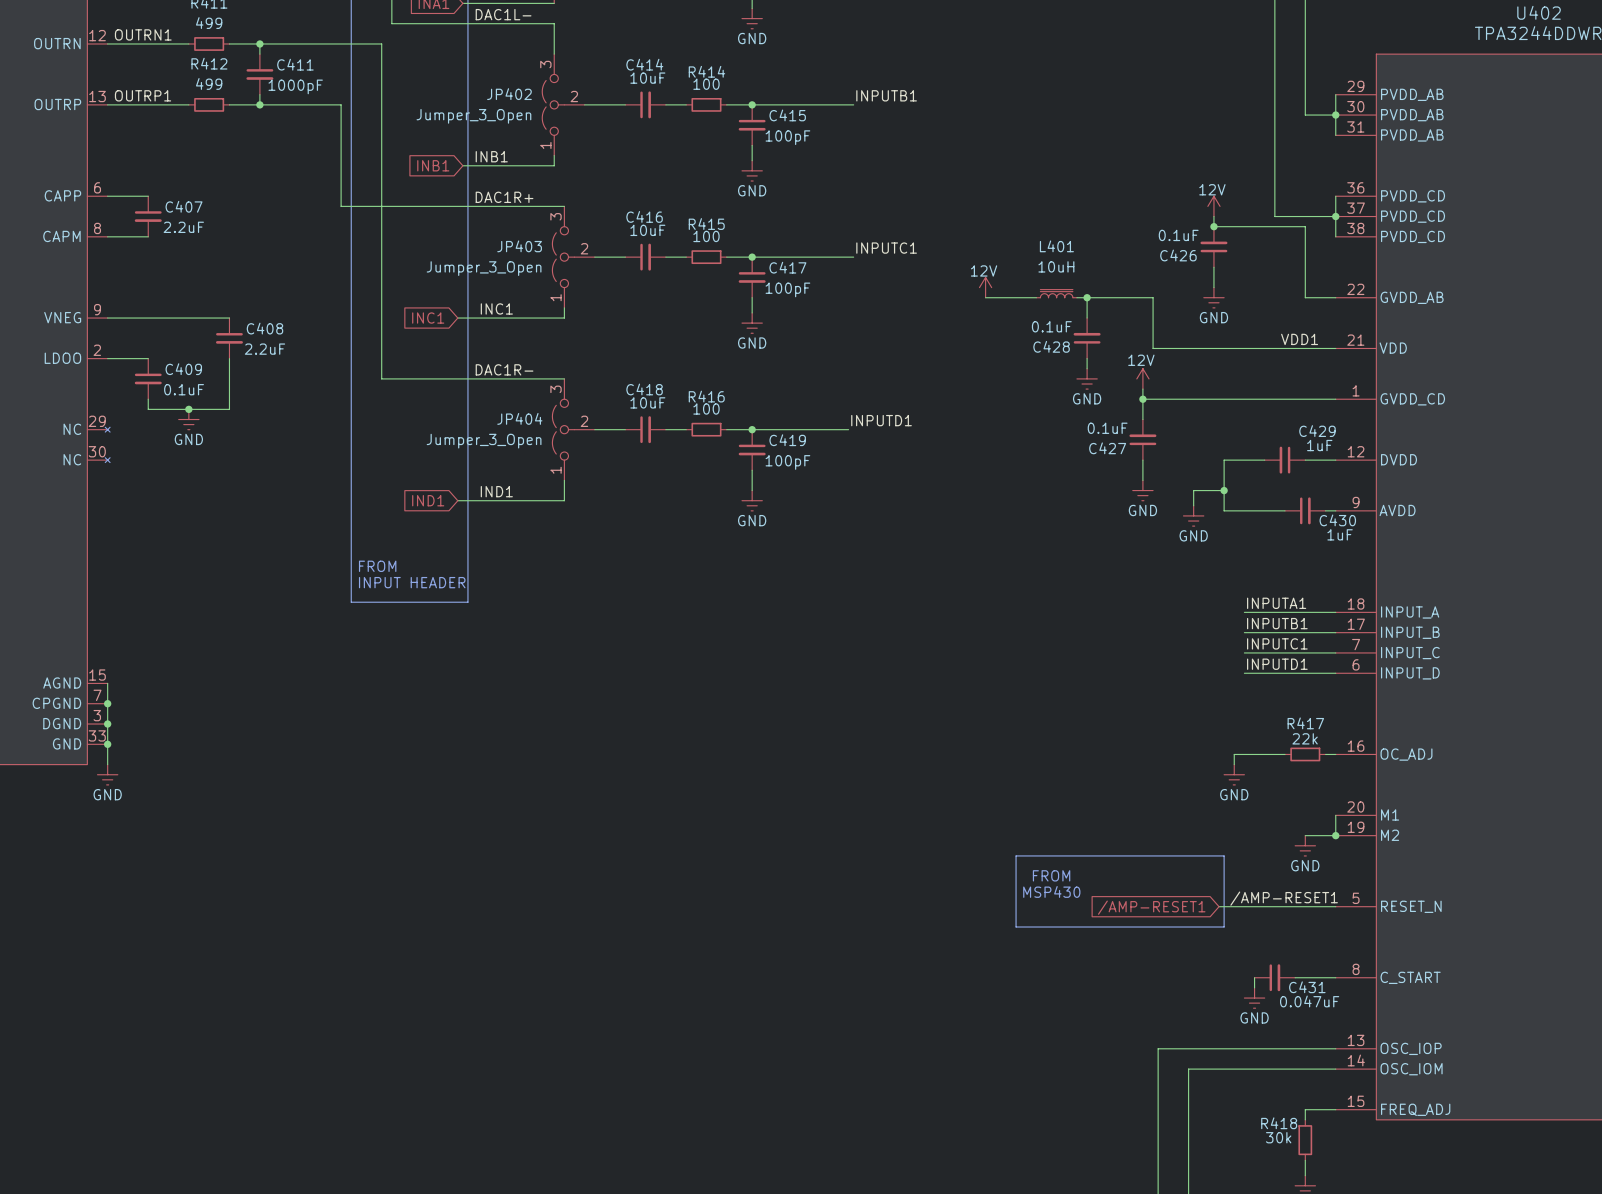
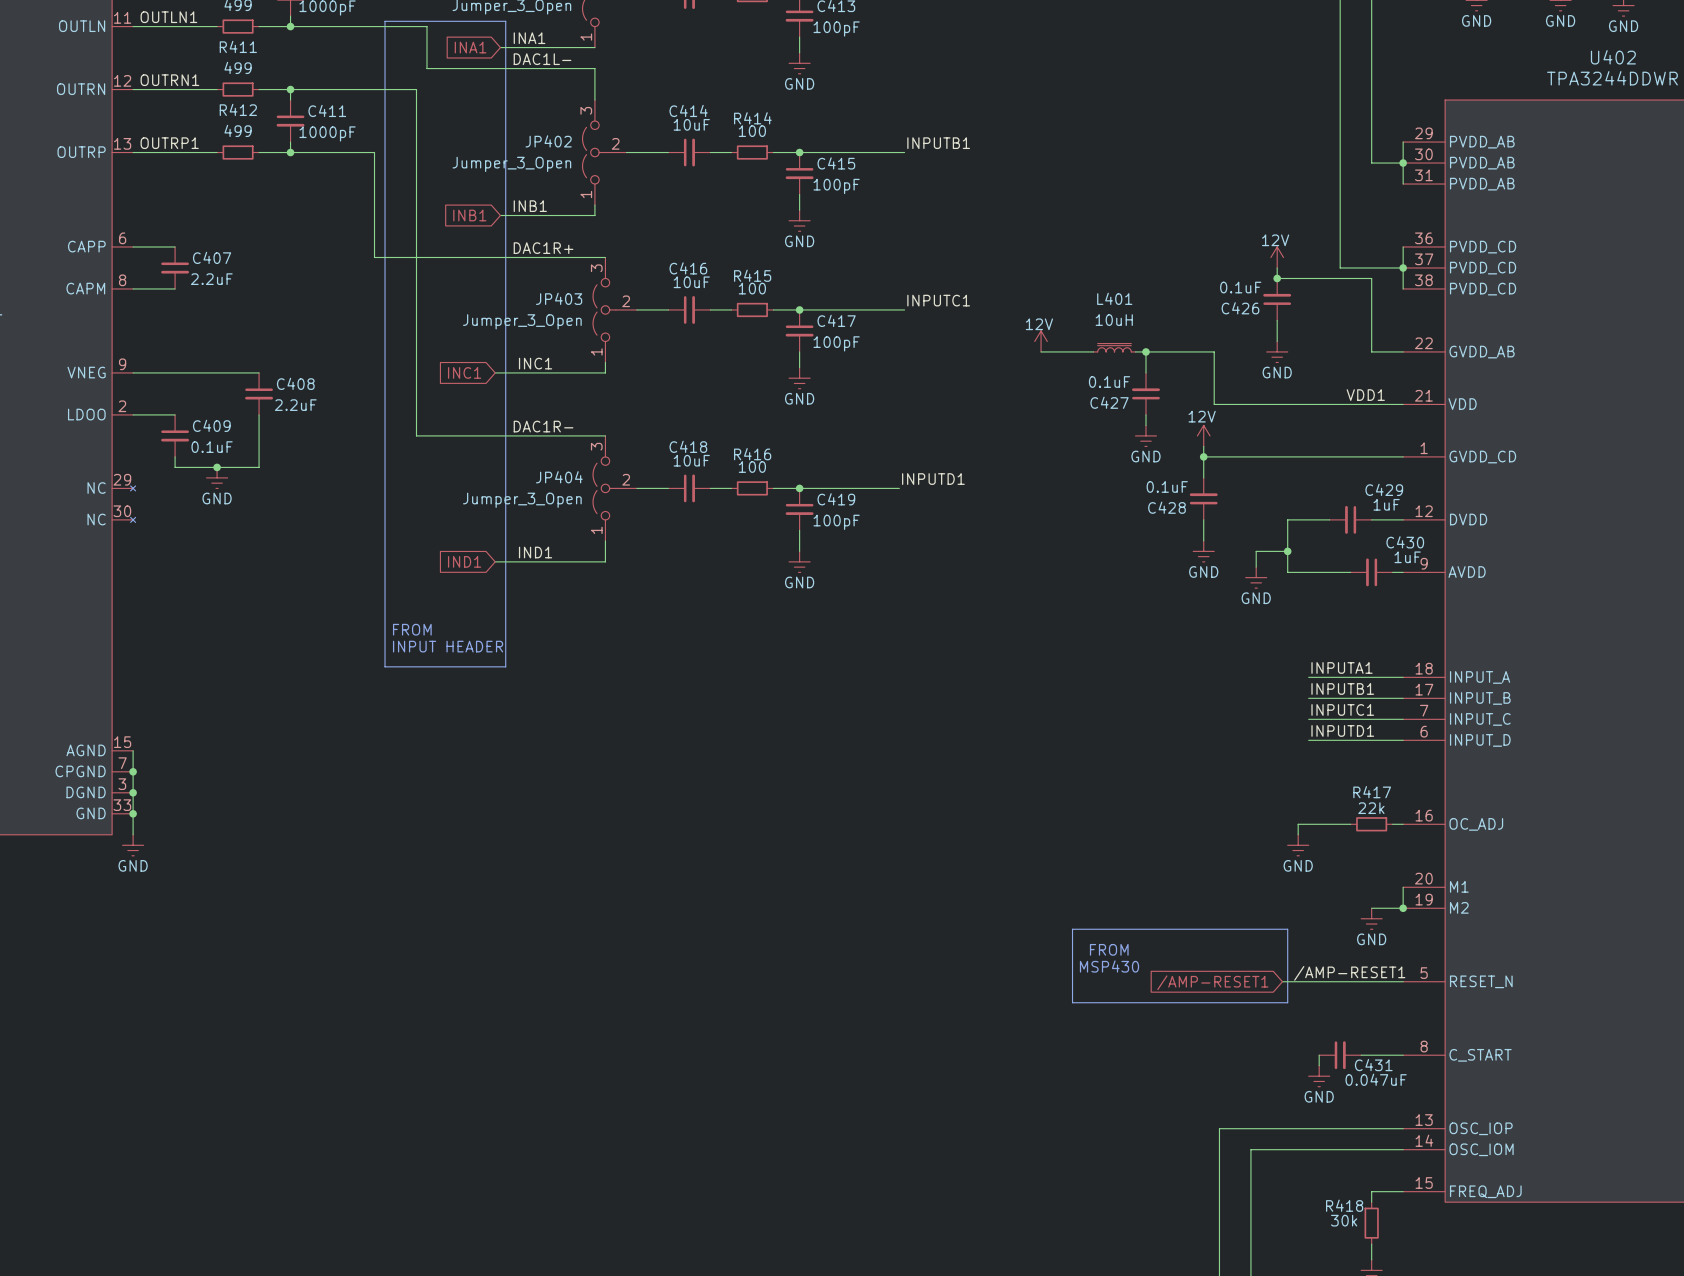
C428 name: C428 (1051, 346) -> C427 (1109, 402)
C427 name: C427 (1107, 448) -> C428 (1166, 507)
C430 rotation: 0° (1305, 510) -> 180° (1371, 572)
C430 name position: C430 (1337, 520) -> C430 (1405, 542)
C430 value position: 1uF (1340, 534) -> 1uF (1407, 557)

